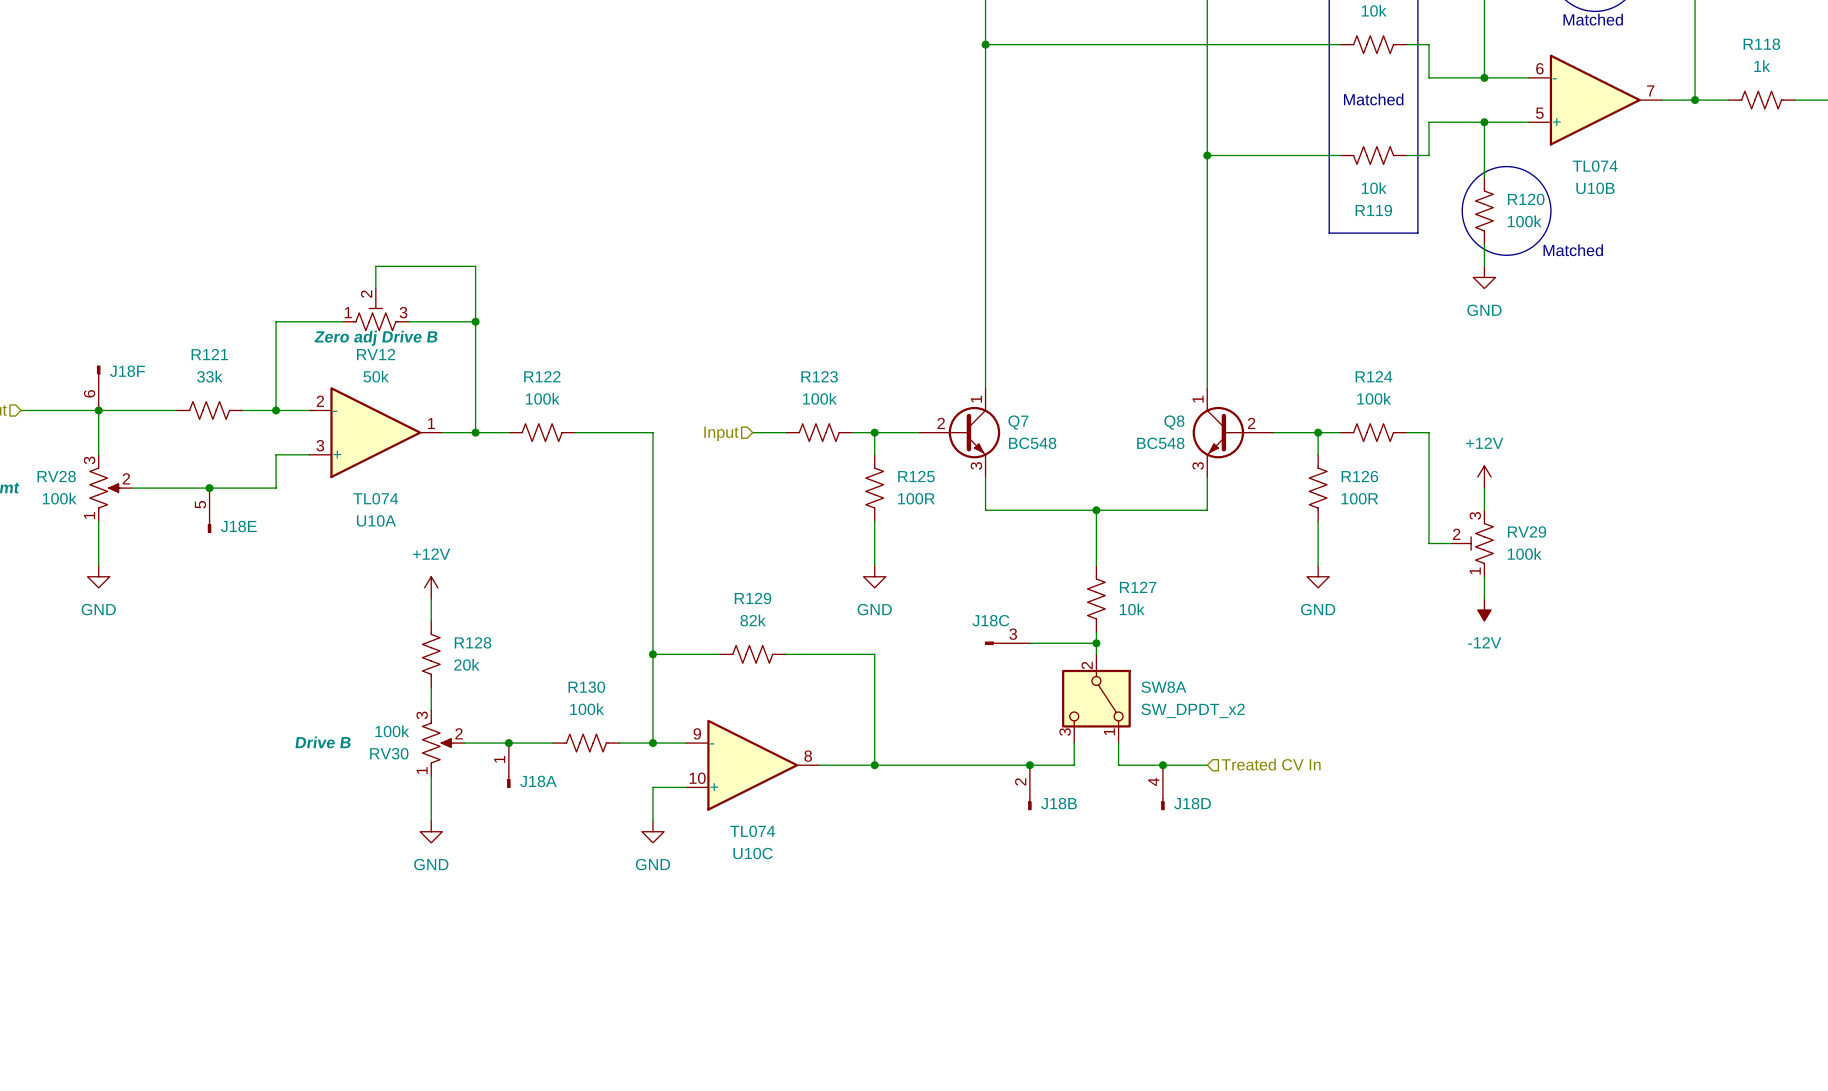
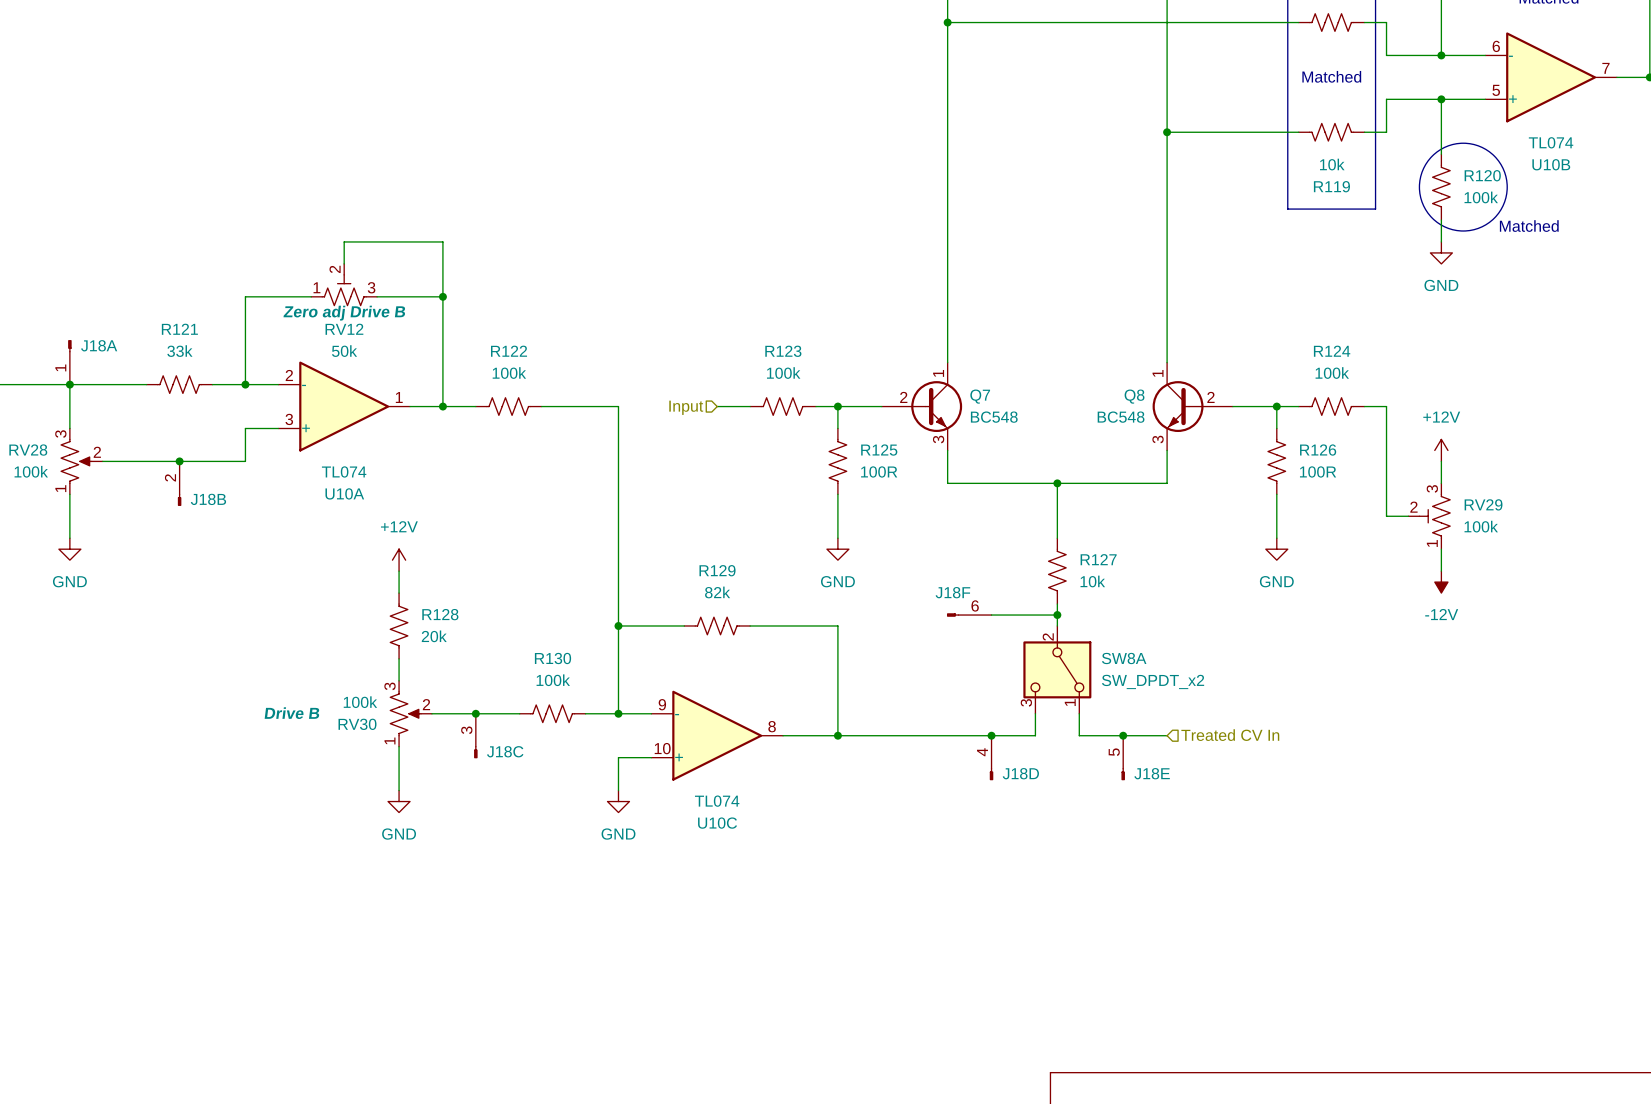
J18F rotation: 0° (98, 371) -> 90° counterclockwise (953, 615)
J18F position: (98, 387) -> (969, 615)
J18E position: (209, 510) -> (1123, 757)
J18C name position: J18C (990, 620) -> J18C (505, 751)
J18C rotation: 0° (991, 643) -> 90° counterclockwise (475, 752)
J18C position: (1007, 643) -> (475, 736)
J18A position: (508, 765) -> (69, 362)
J18A rotation: 0° (508, 781) -> 180° (69, 346)
J18A name position: J18A (538, 781) -> J18A (99, 345)
J18B position: (1029, 787) -> (179, 483)
J18D position: (1162, 787) -> (991, 757)

